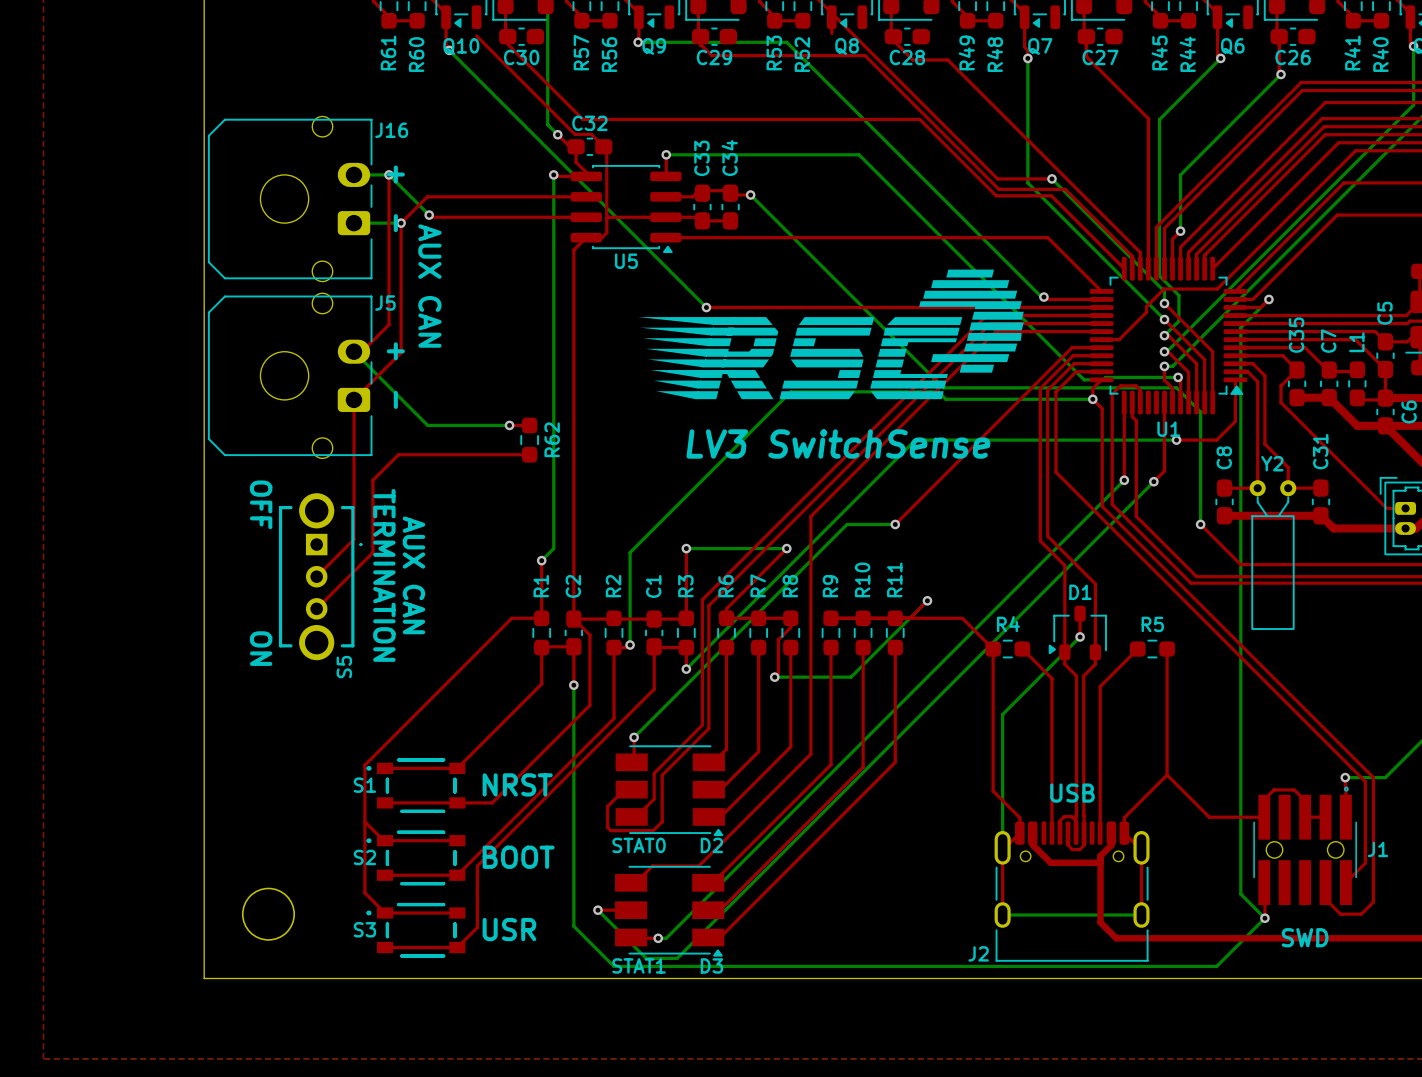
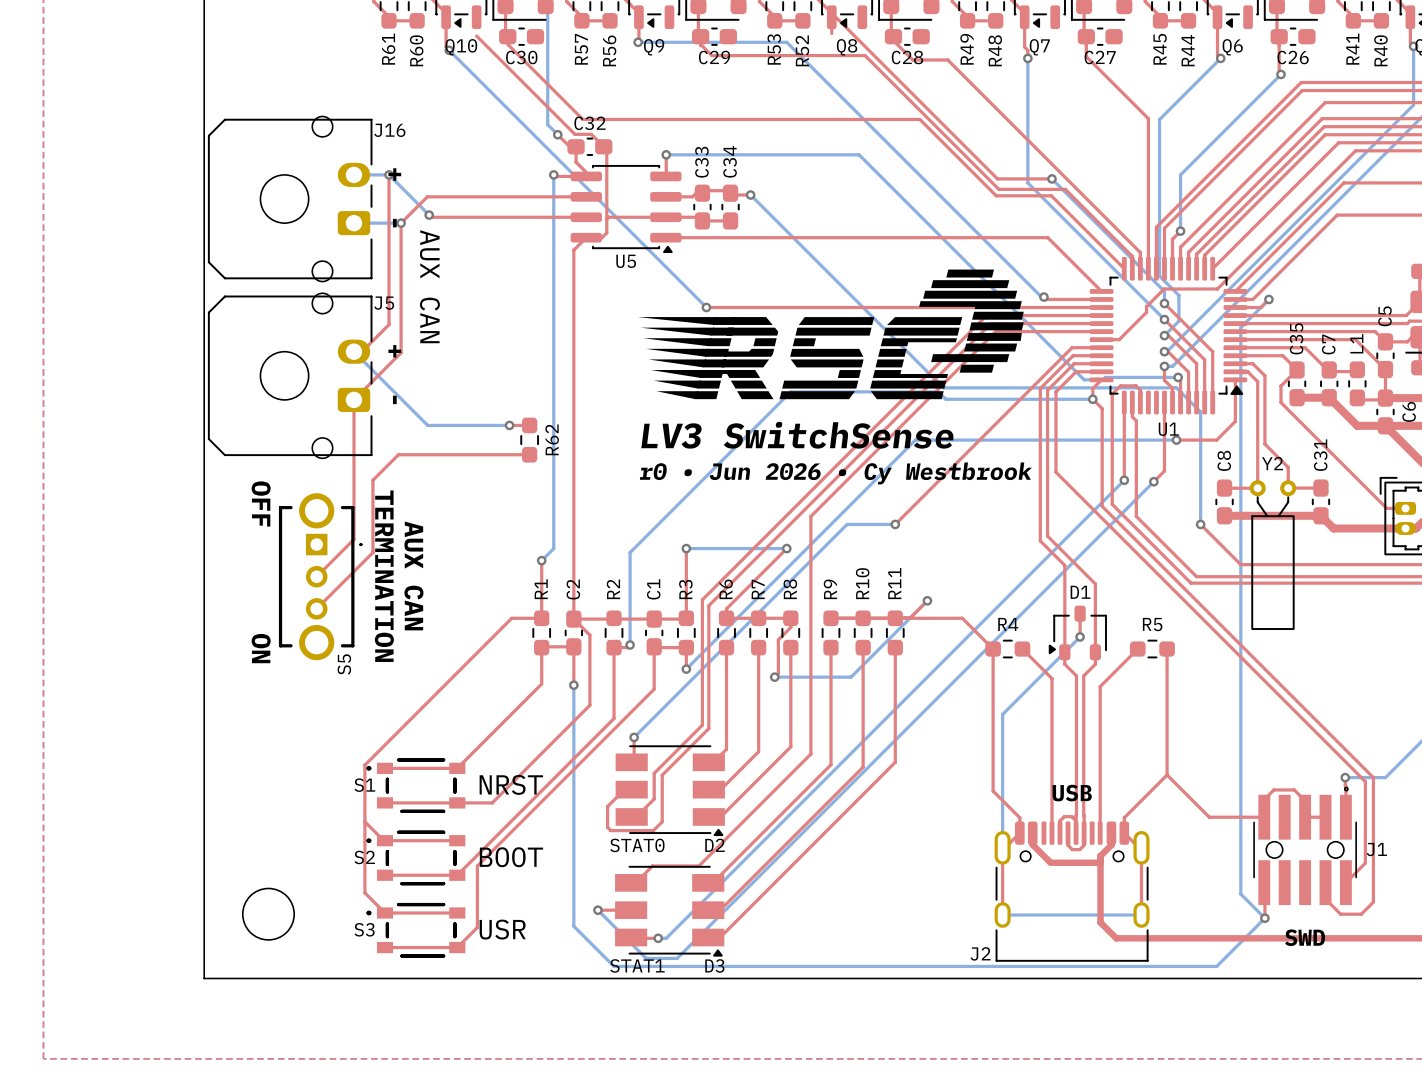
text position: LV3 SwitchSense (838, 444) -> LV3 SwitchSense (797, 435)
text: none -> r0 • Jun 2026 • Cy Westbrook (835, 473)

